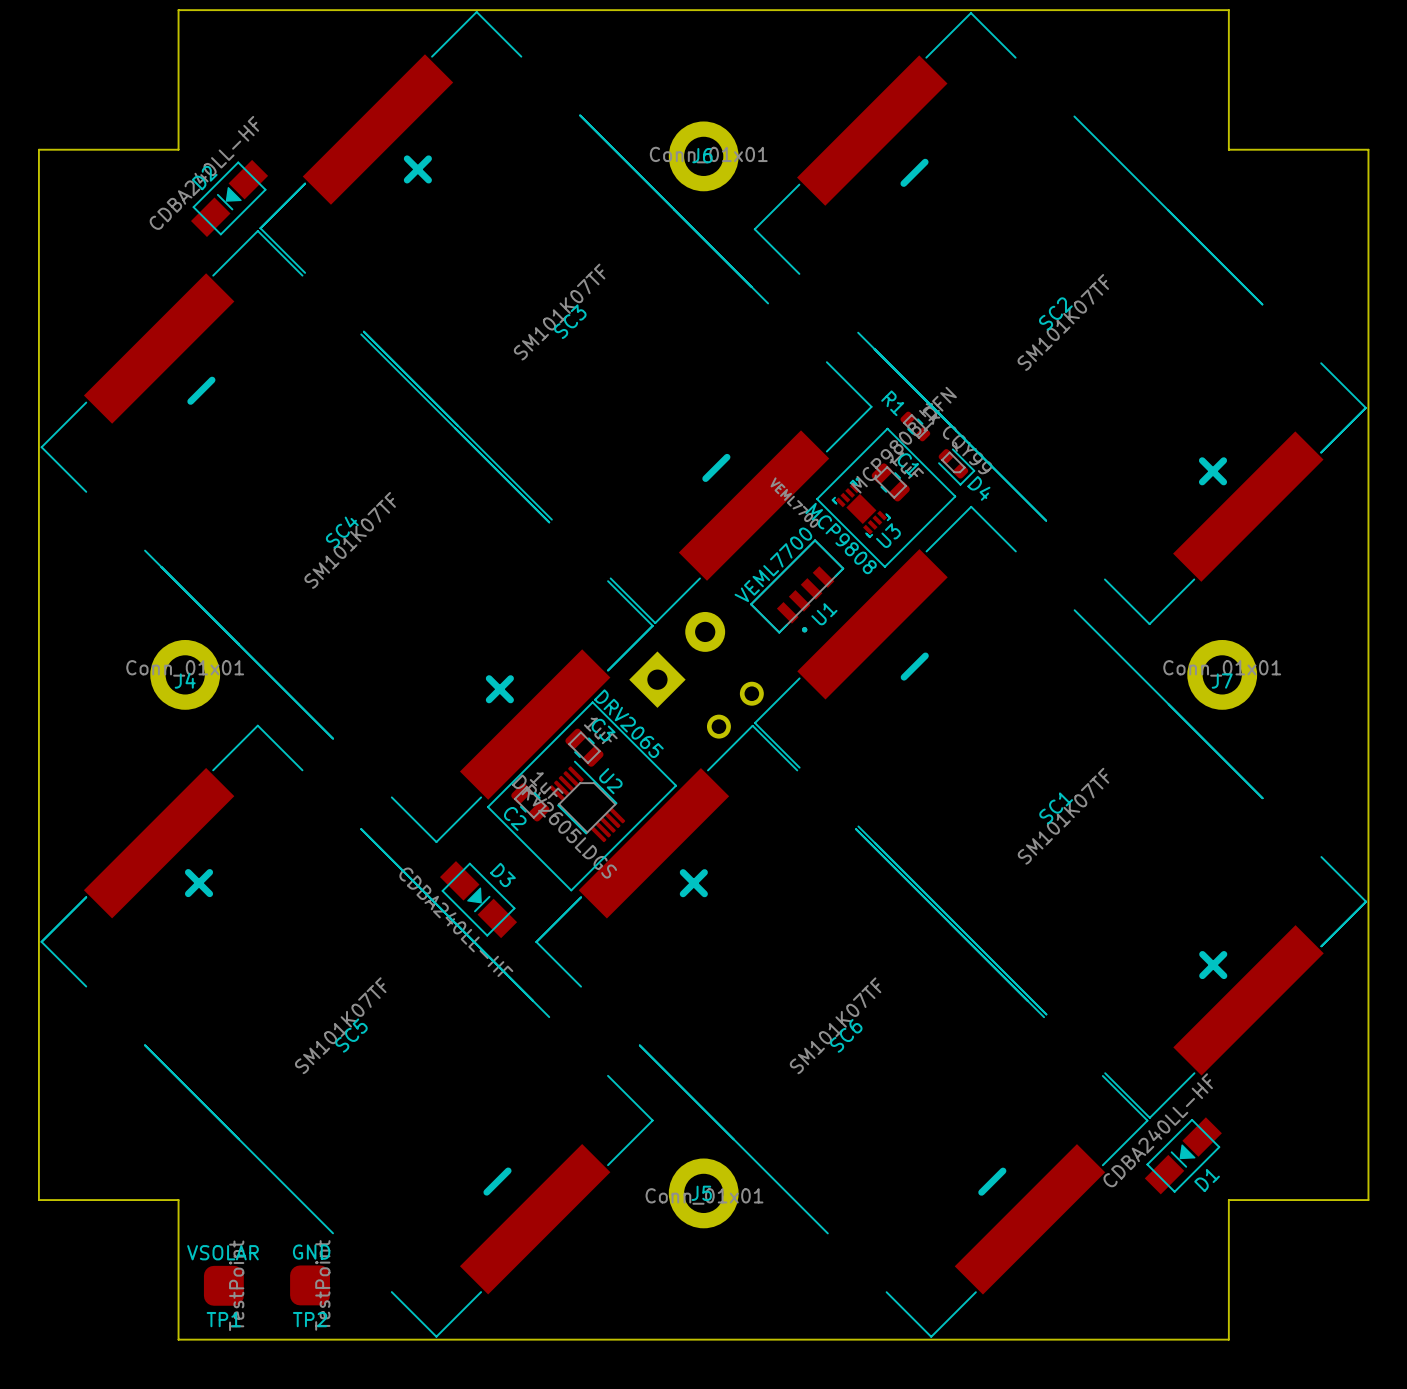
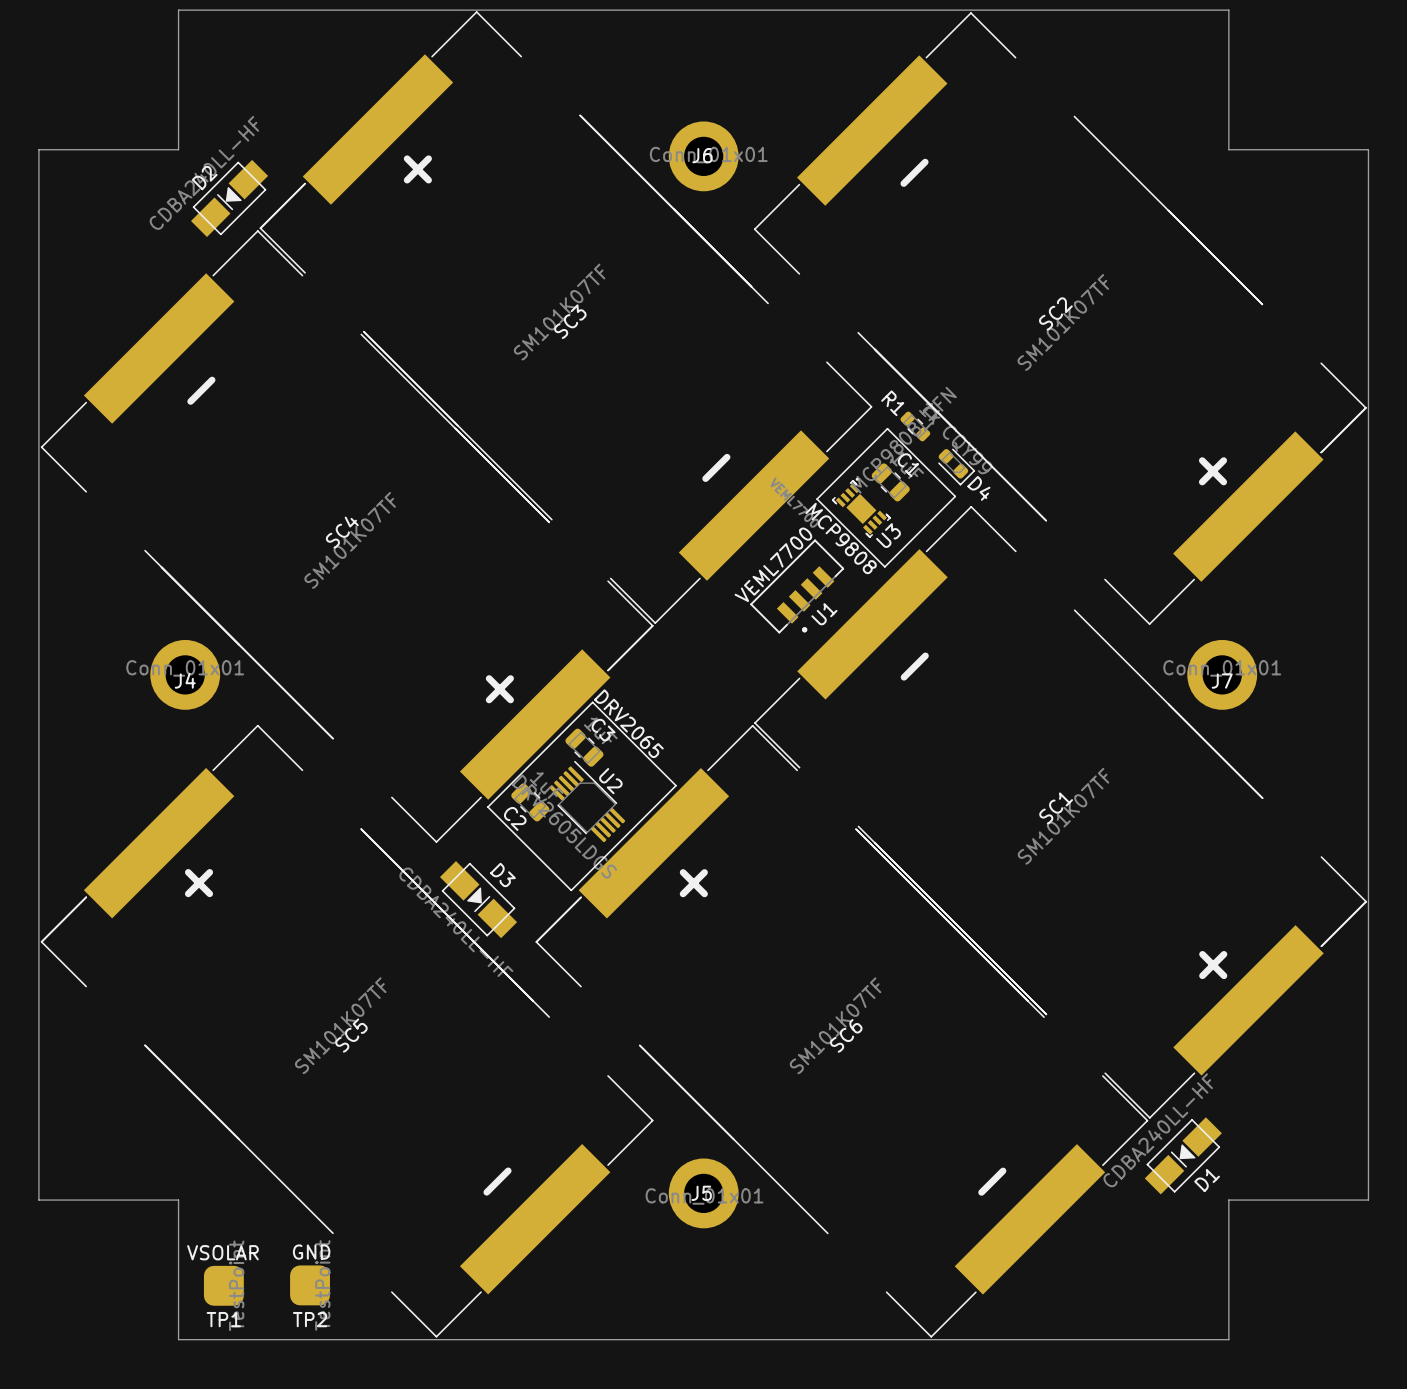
part: (677, 659) -> none
part: (735, 710) -> none

